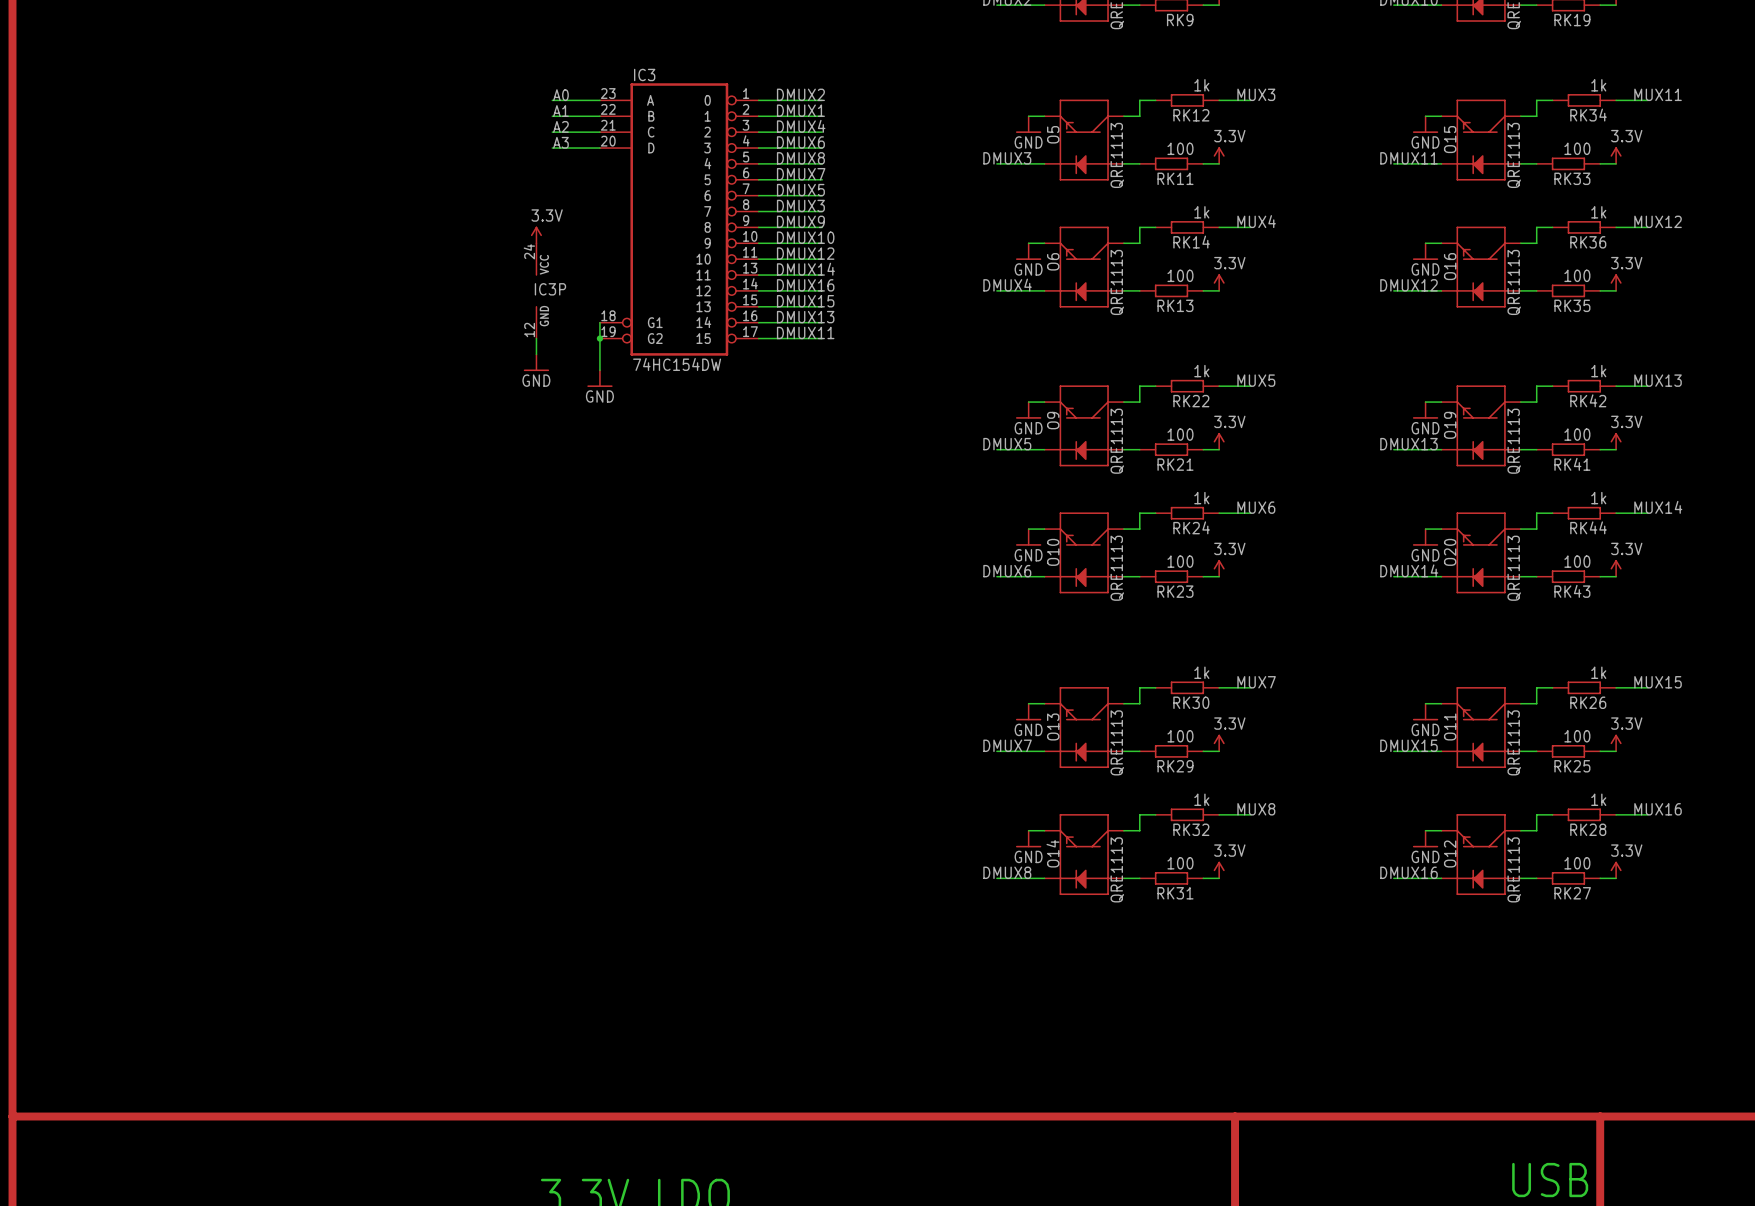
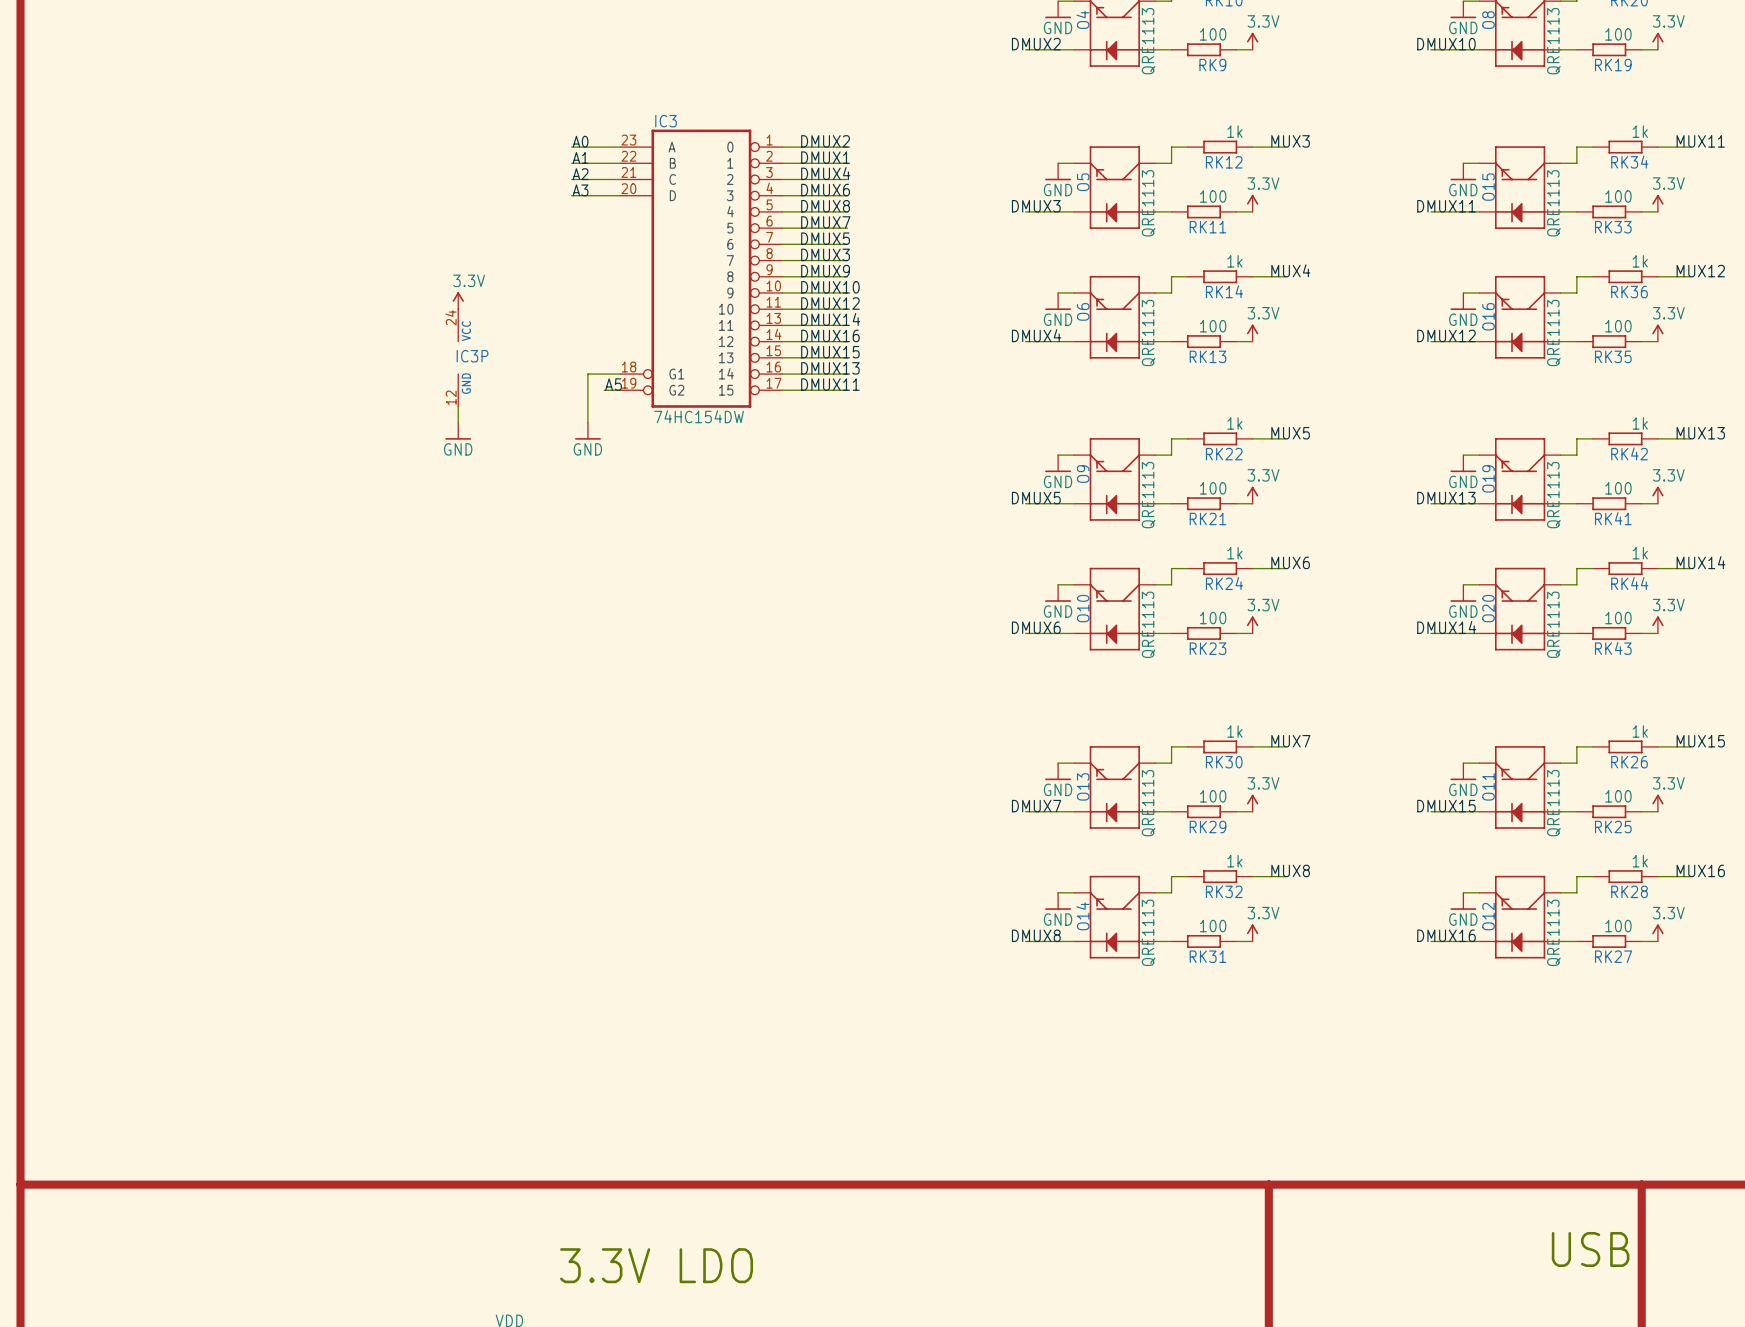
power symbol position: 3.3V (536, 234) -> 3.3V (458, 300)
IC3P position: (536, 290) -> (458, 357)
wire: (599, 322) (599, 370) -> (620, 374) (587, 374) (587, 422)
label: none -> A5 (613, 384)
wire: (536, 338) (536, 354) -> (458, 406) (458, 422)
wire: none -> (604, 390) (620, 390)
junction: (599, 338) -> none
power symbol: GND (536, 362) -> none
power symbol: none -> GND (458, 431)
power symbol: none -> GND (587, 431)
power symbol: GND (599, 378) -> none

